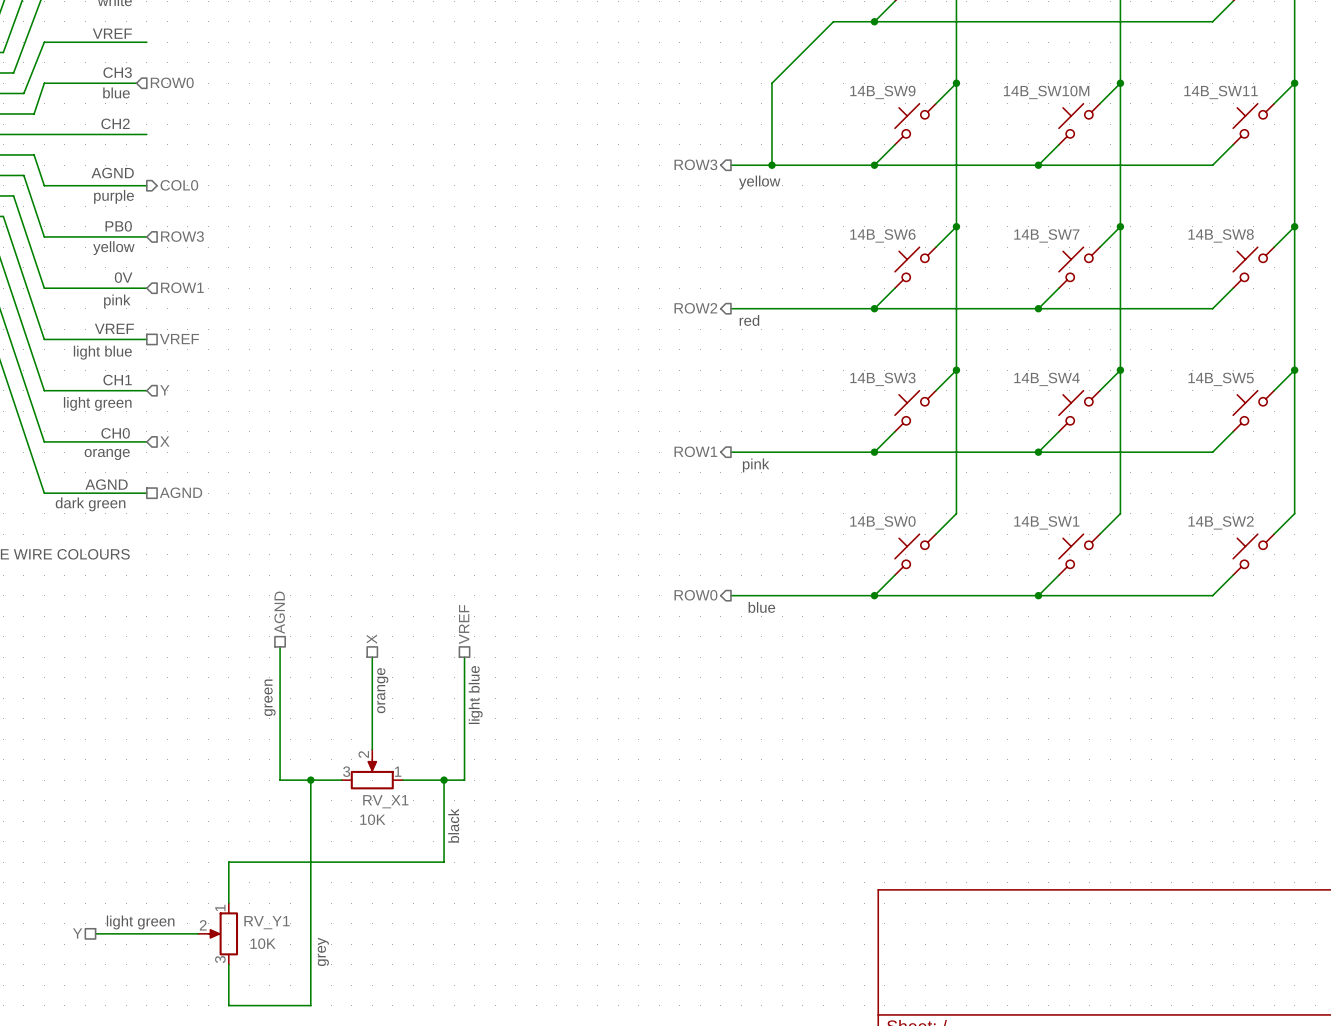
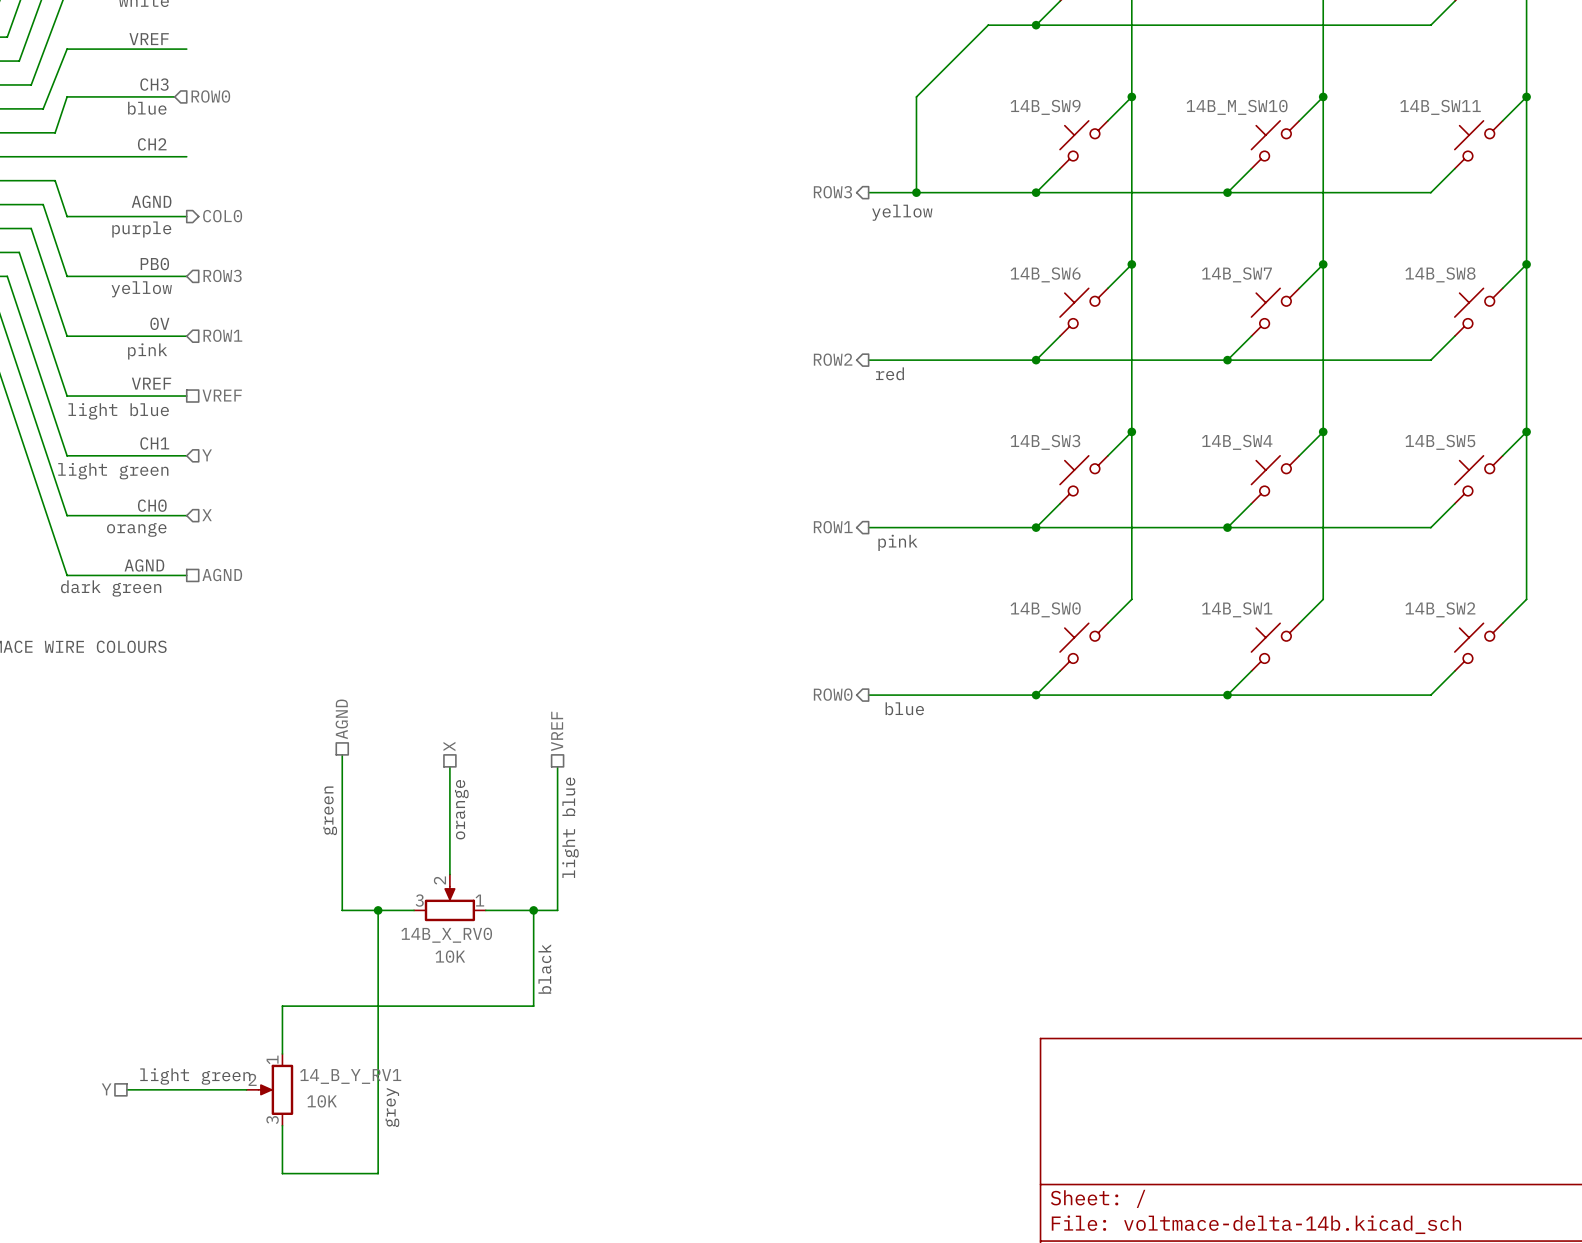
14B_SW10M name: 14B_SW10M (1046, 92) -> 14B_M_SW10 (1237, 107)
RV_X1 name: RV_X1 (385, 801) -> 14B_X_RV0 (446, 935)
RV_Y1 name: RV_Y1 (267, 922) -> 14_B_Y_RV1 (350, 1076)

